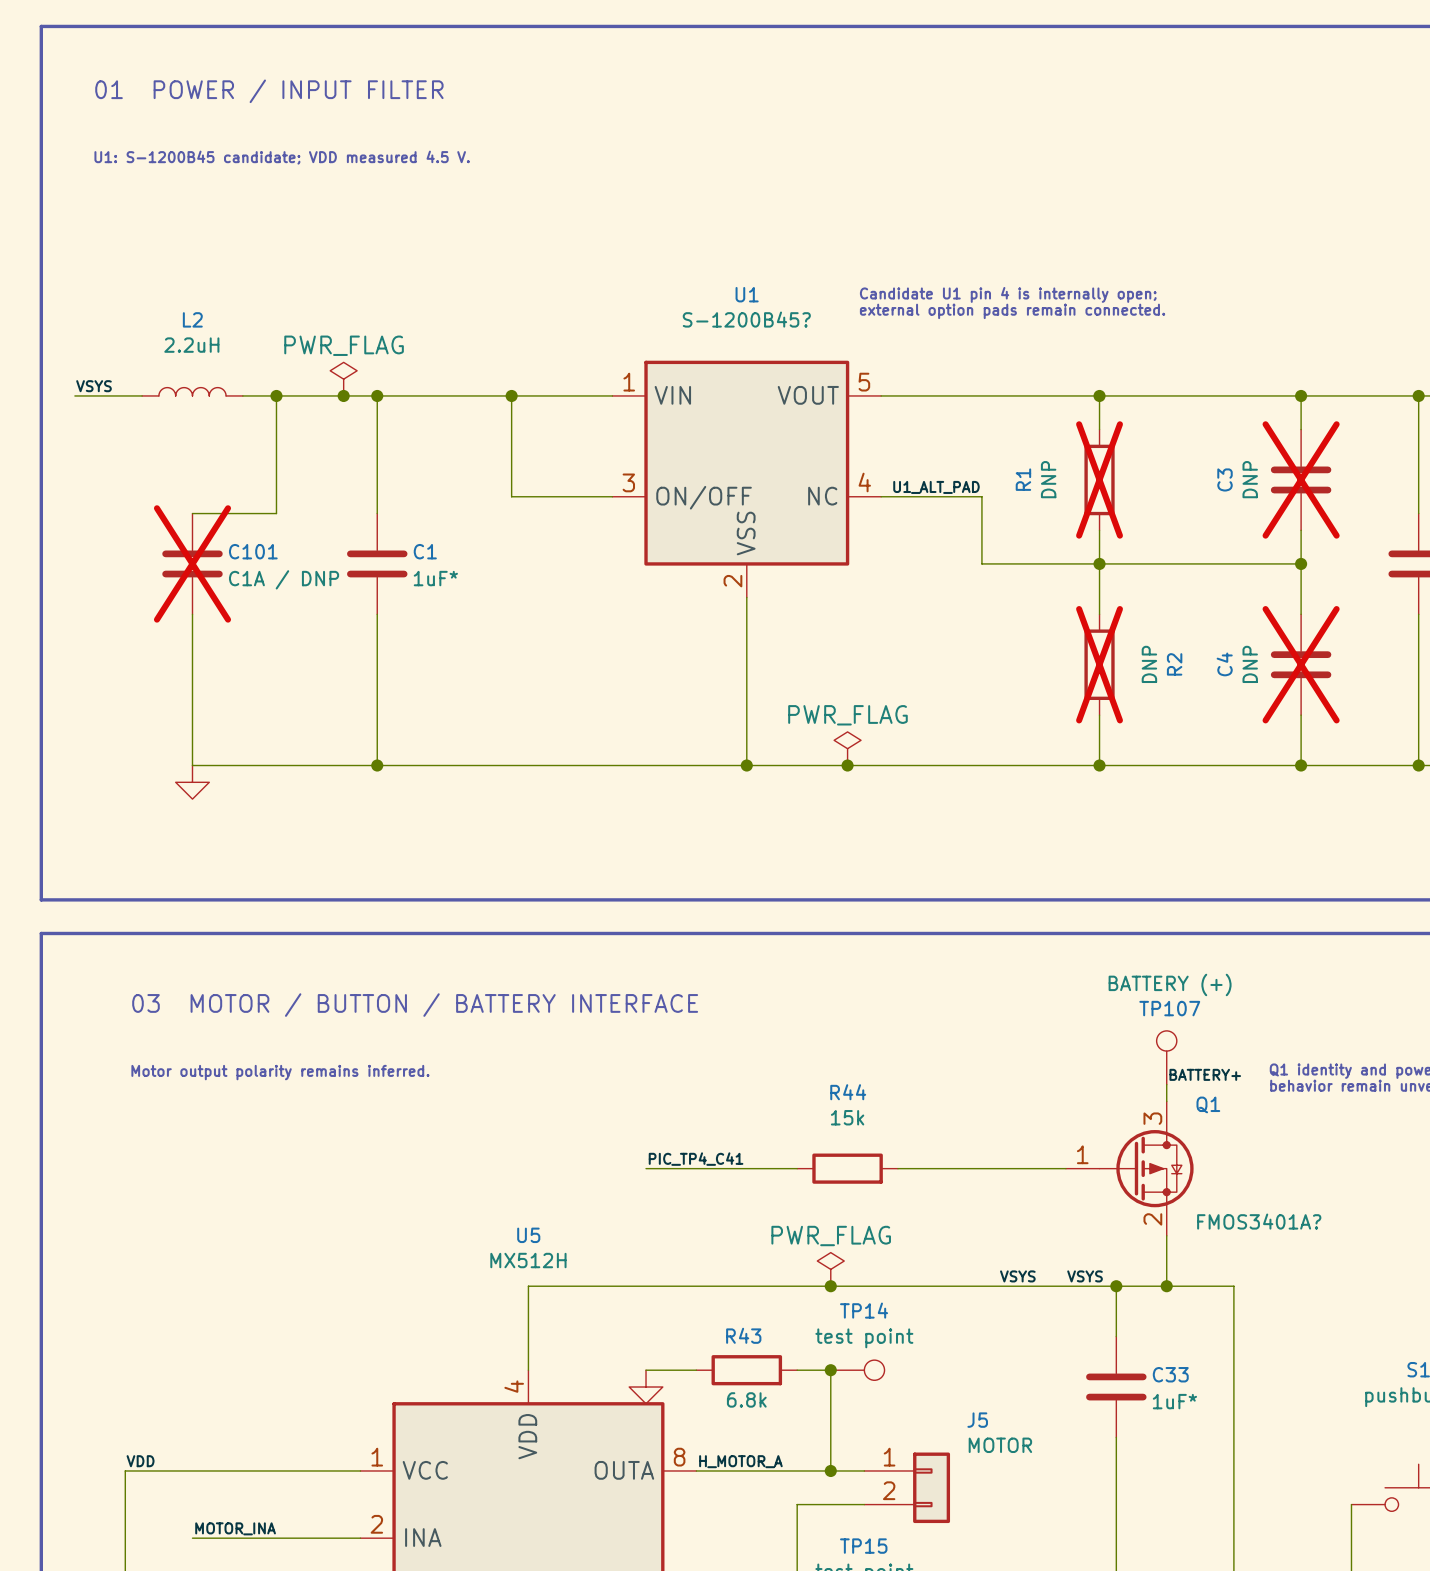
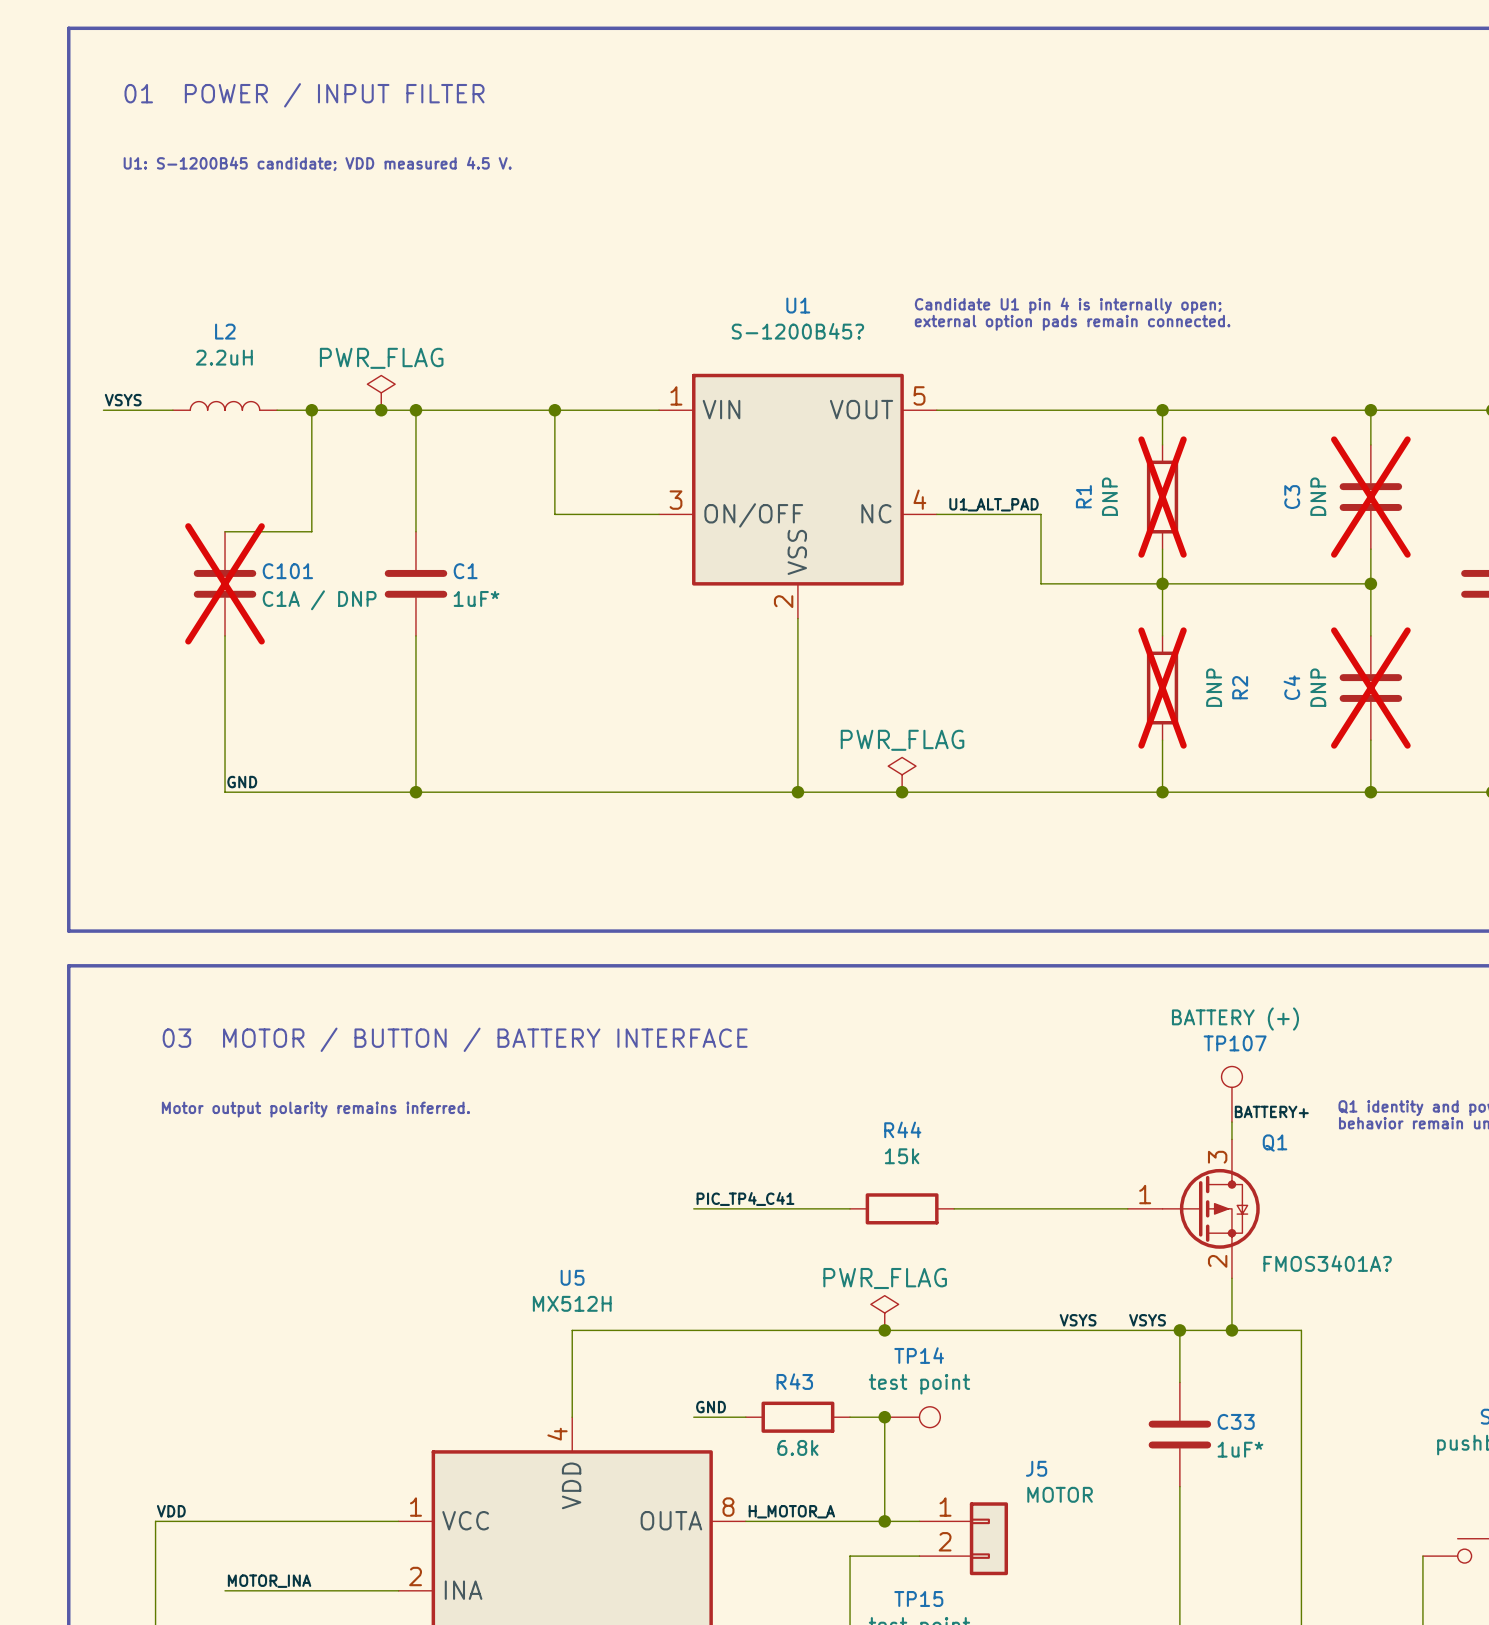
label: none -> GND (242, 782)
power symbol: (192, 782) -> none
label: none -> GND (711, 1407)
power symbol: (646, 1387) -> none

